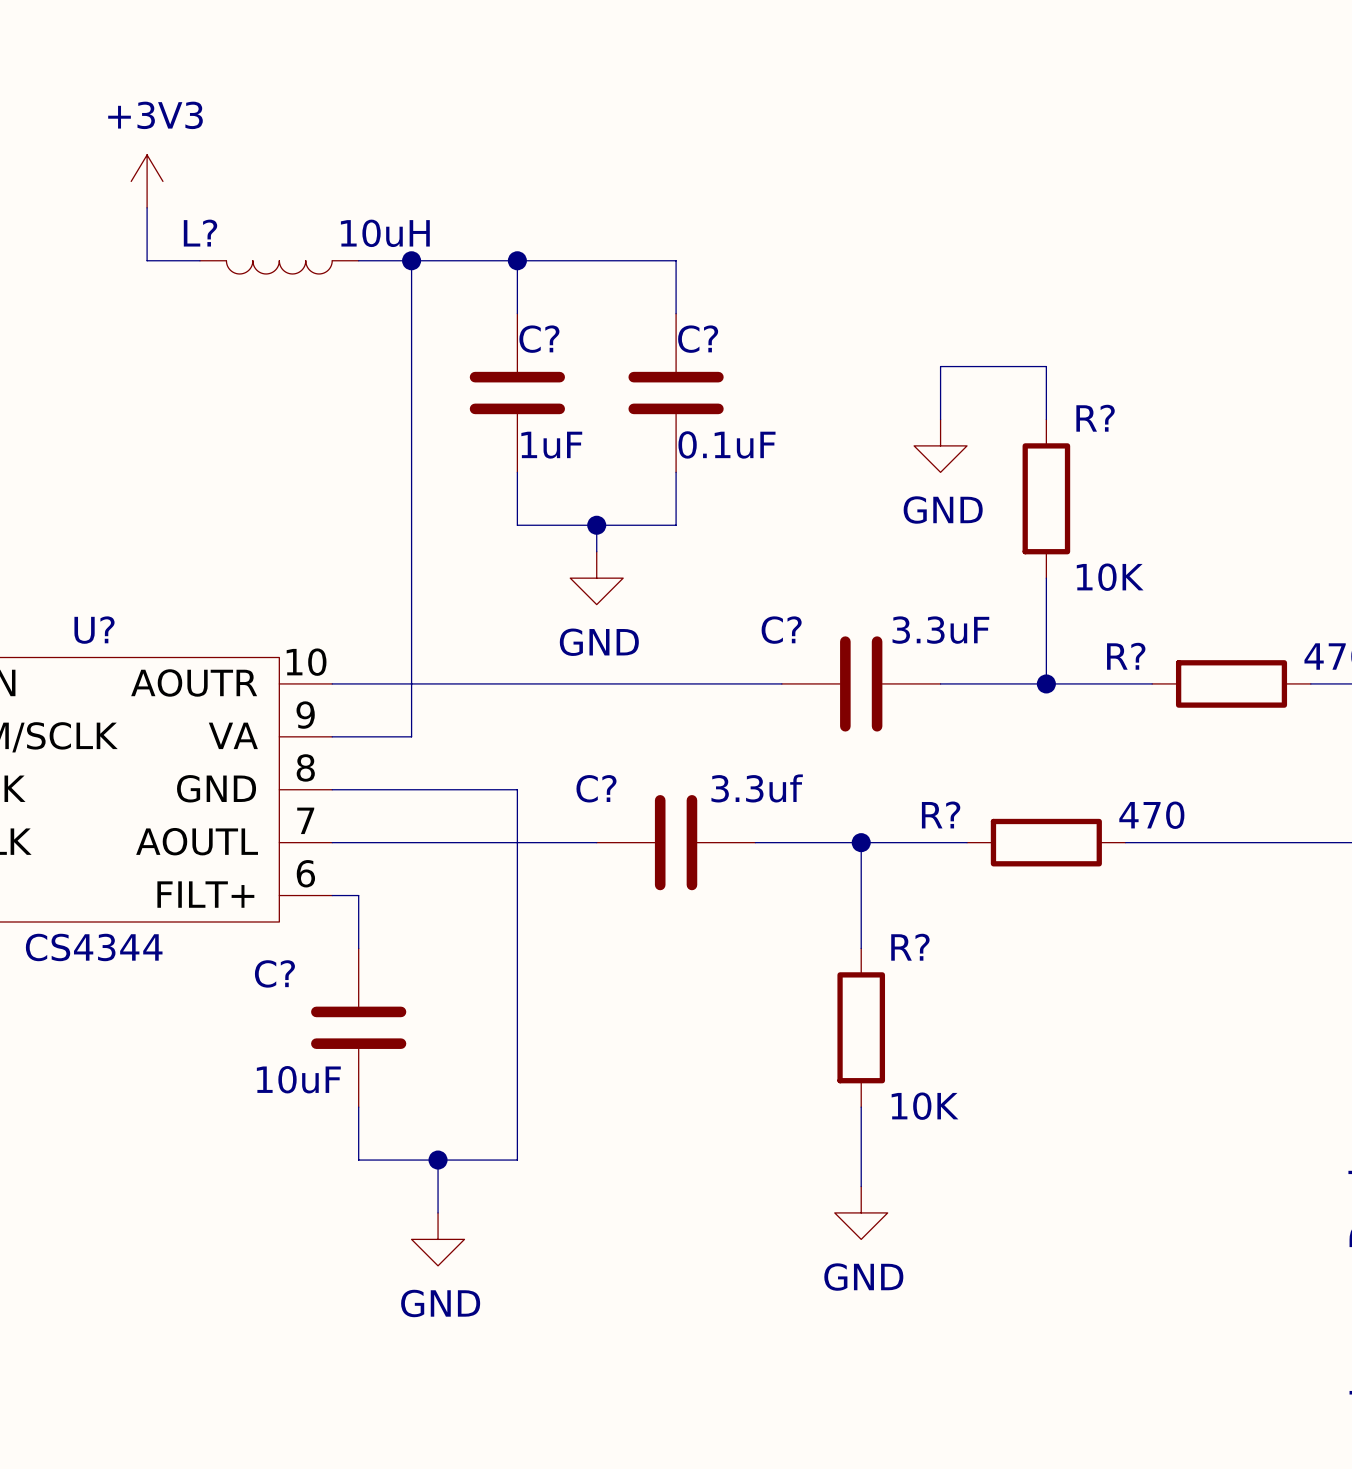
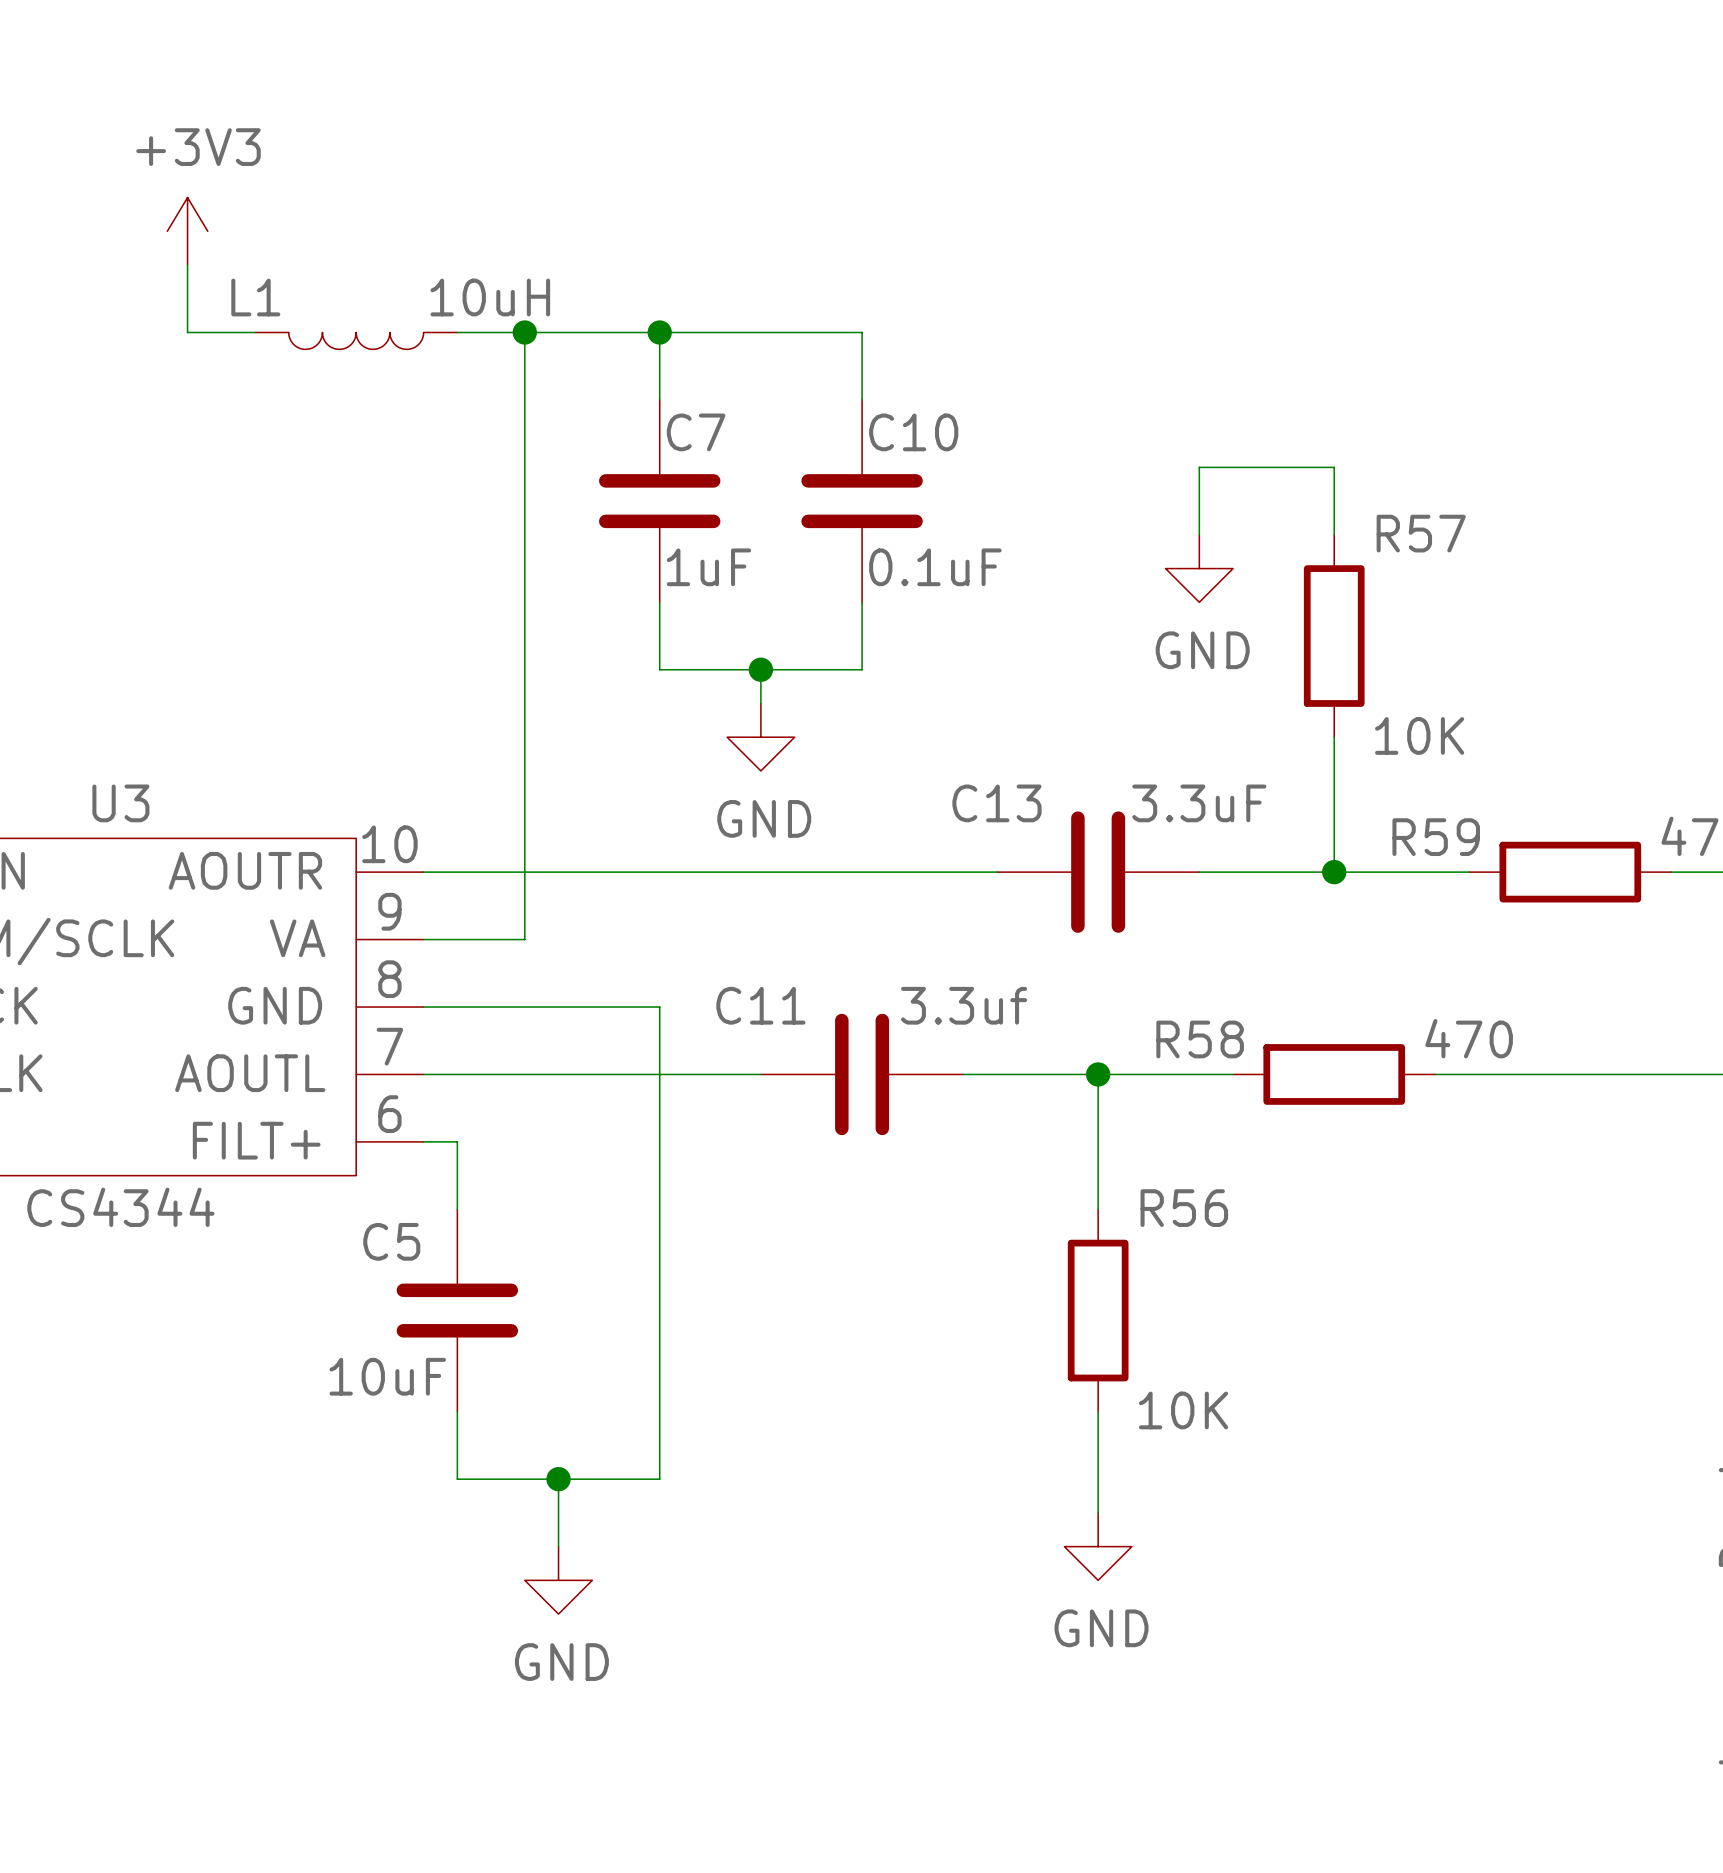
L? name: L? (200, 233) -> L1 (255, 297)
C? name: C? (539, 339) -> C7 (696, 432)
C? name: C? (698, 339) -> C10 (913, 432)
R? name: R? (1095, 418) -> R57 (1421, 533)
U? name: U? (94, 630) -> U3 (120, 803)
C? name: C? (781, 630) -> C13 (996, 803)
R? name: R? (1126, 656) -> R59 (1436, 837)
C? name: C? (596, 788) -> C11 (760, 1005)
R? name: R? (941, 814) -> R58 (1200, 1039)
R? name: R? (910, 947) -> R56 (1184, 1208)
C? name: C? (274, 973) -> C5 (391, 1241)

